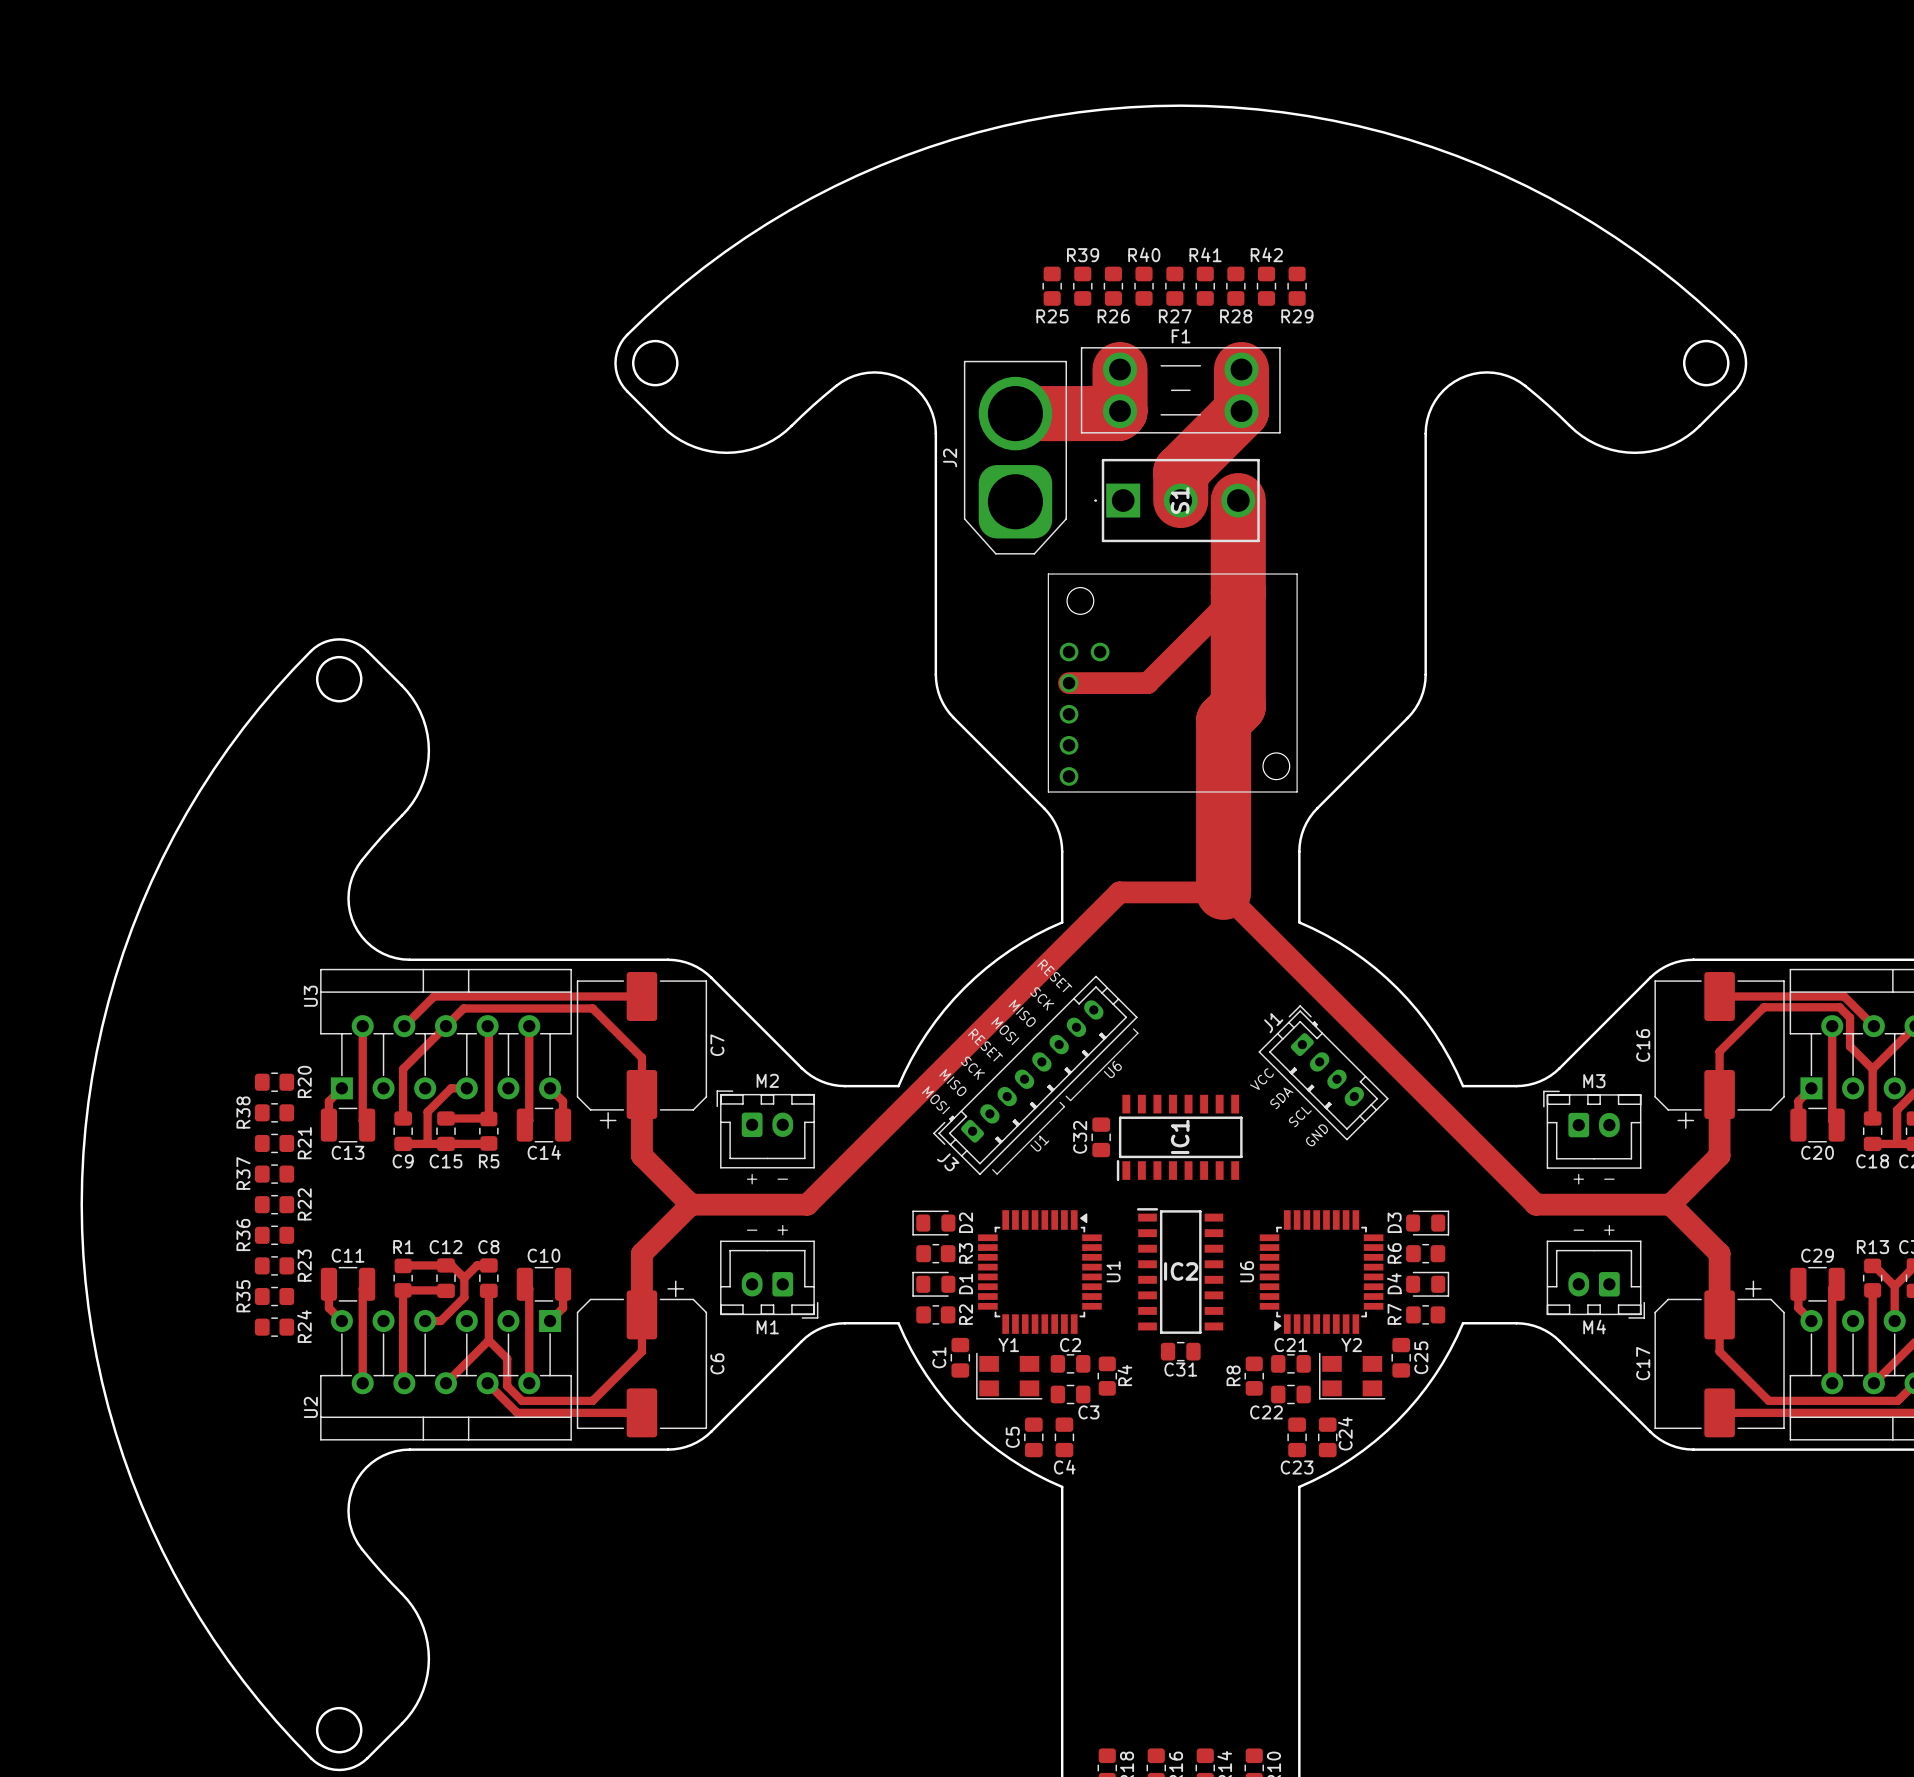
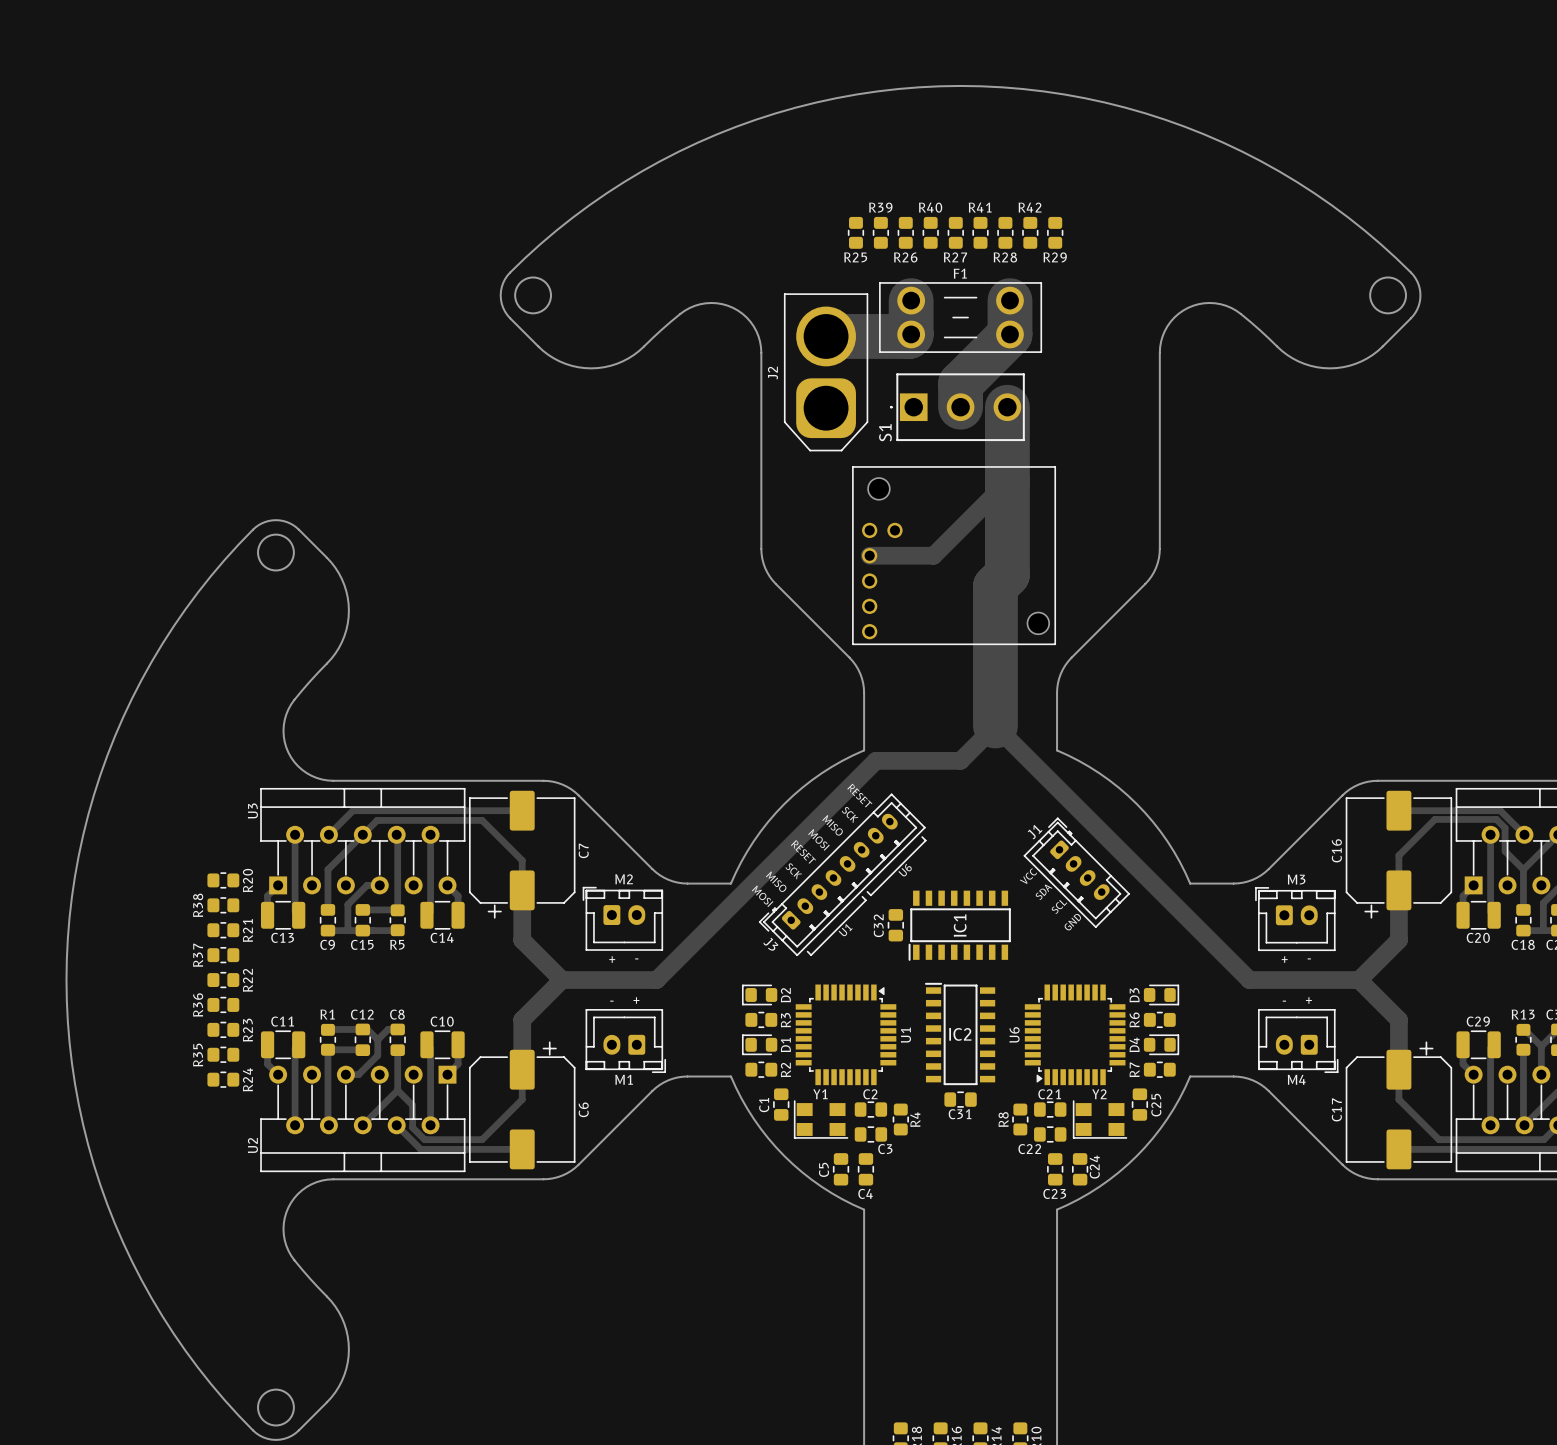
S1 name position: S1 (1180, 500) -> S1 (885, 432)
track: (1223, 892) (1119, 892) (1076, 935) -> (995, 726) (960, 760) (875, 760)

